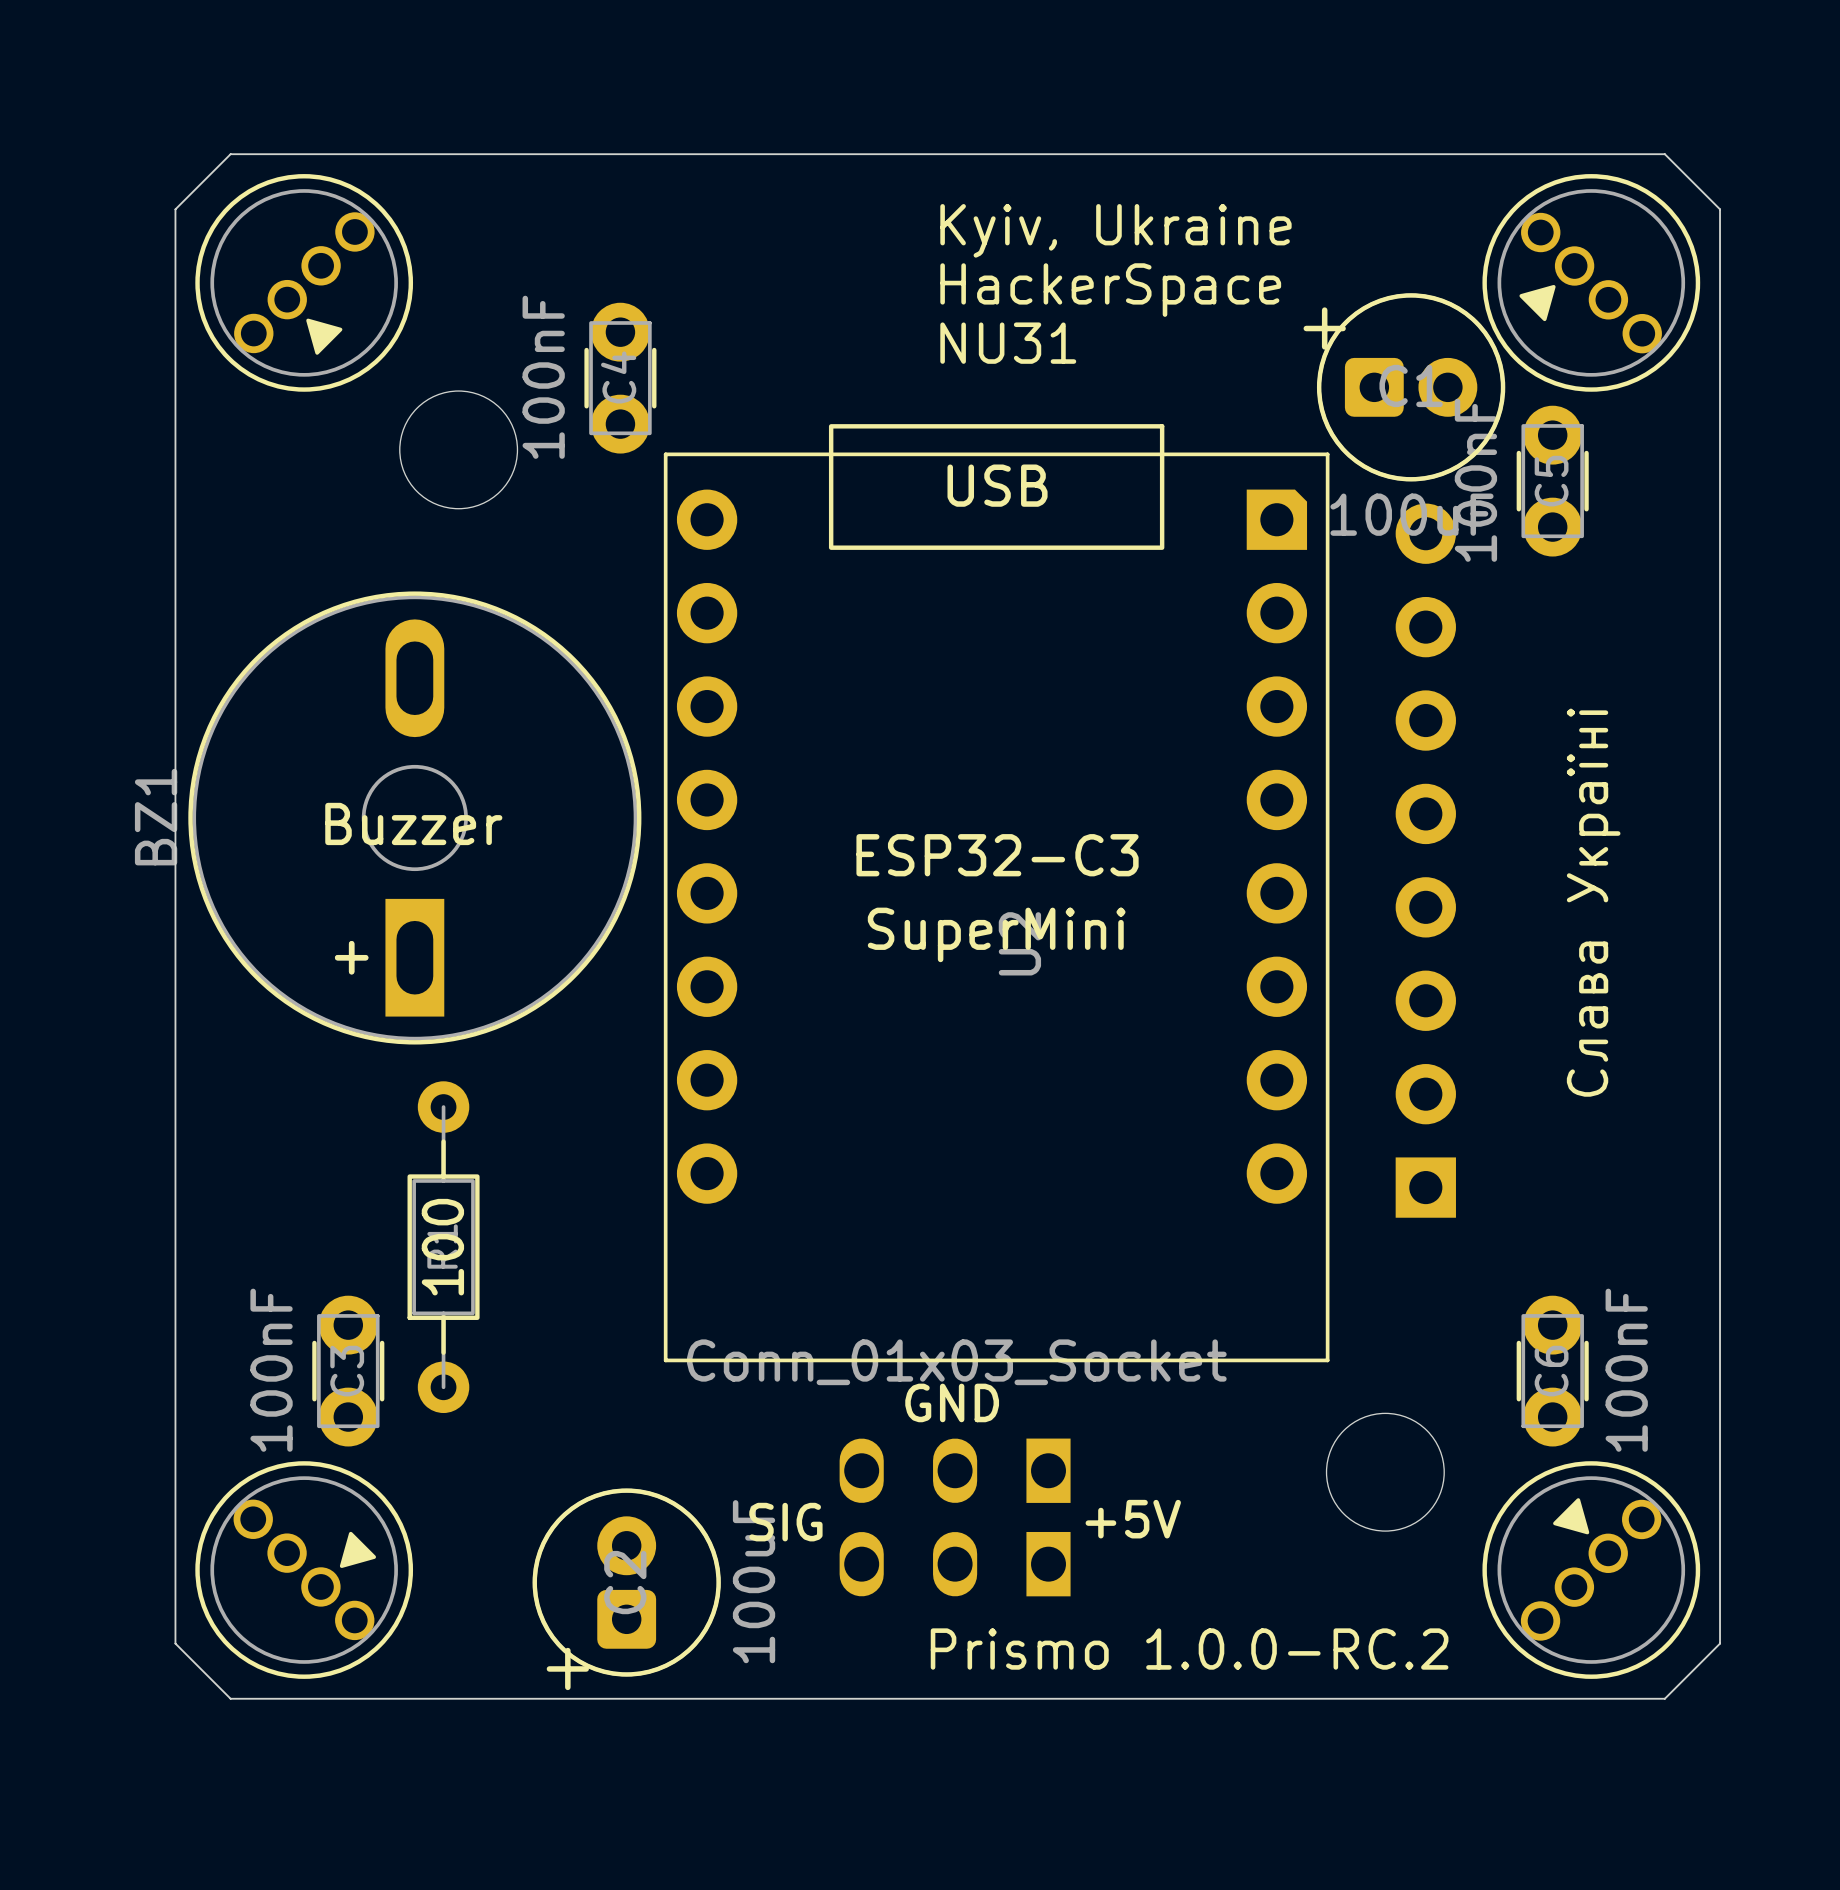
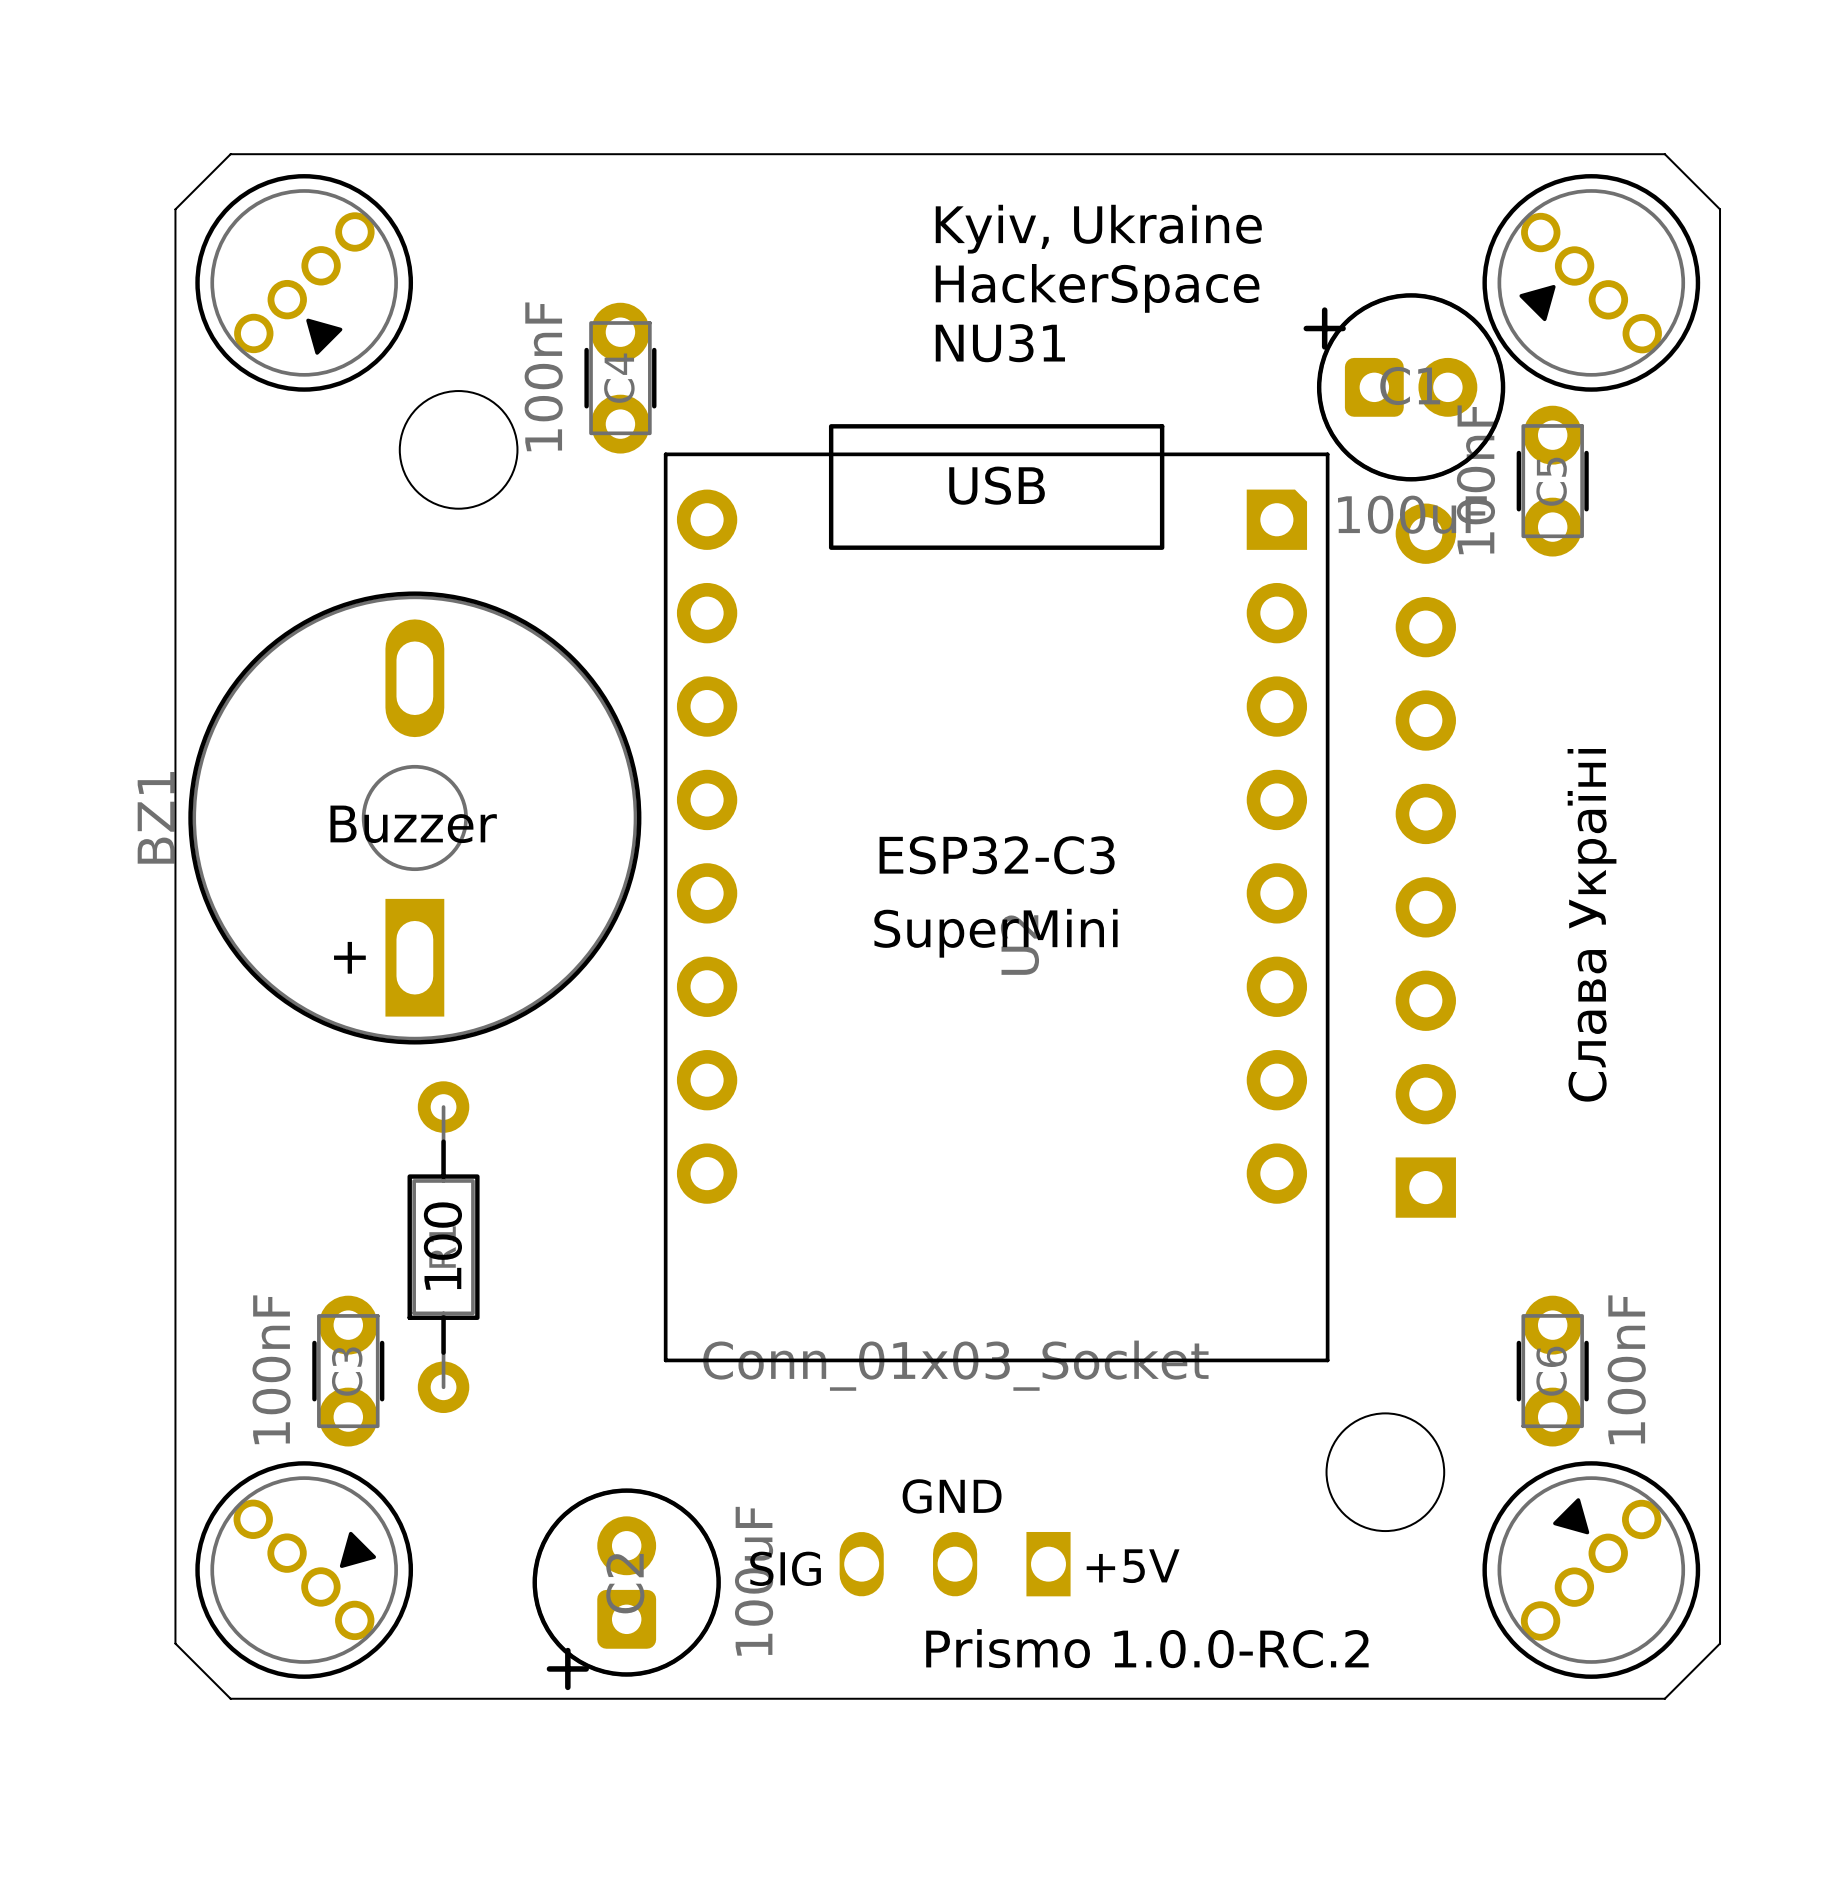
part: Conn_01x03_Socket (955, 1517) -> none
part: none -> Conn_01x03_Socket (955, 1564)

